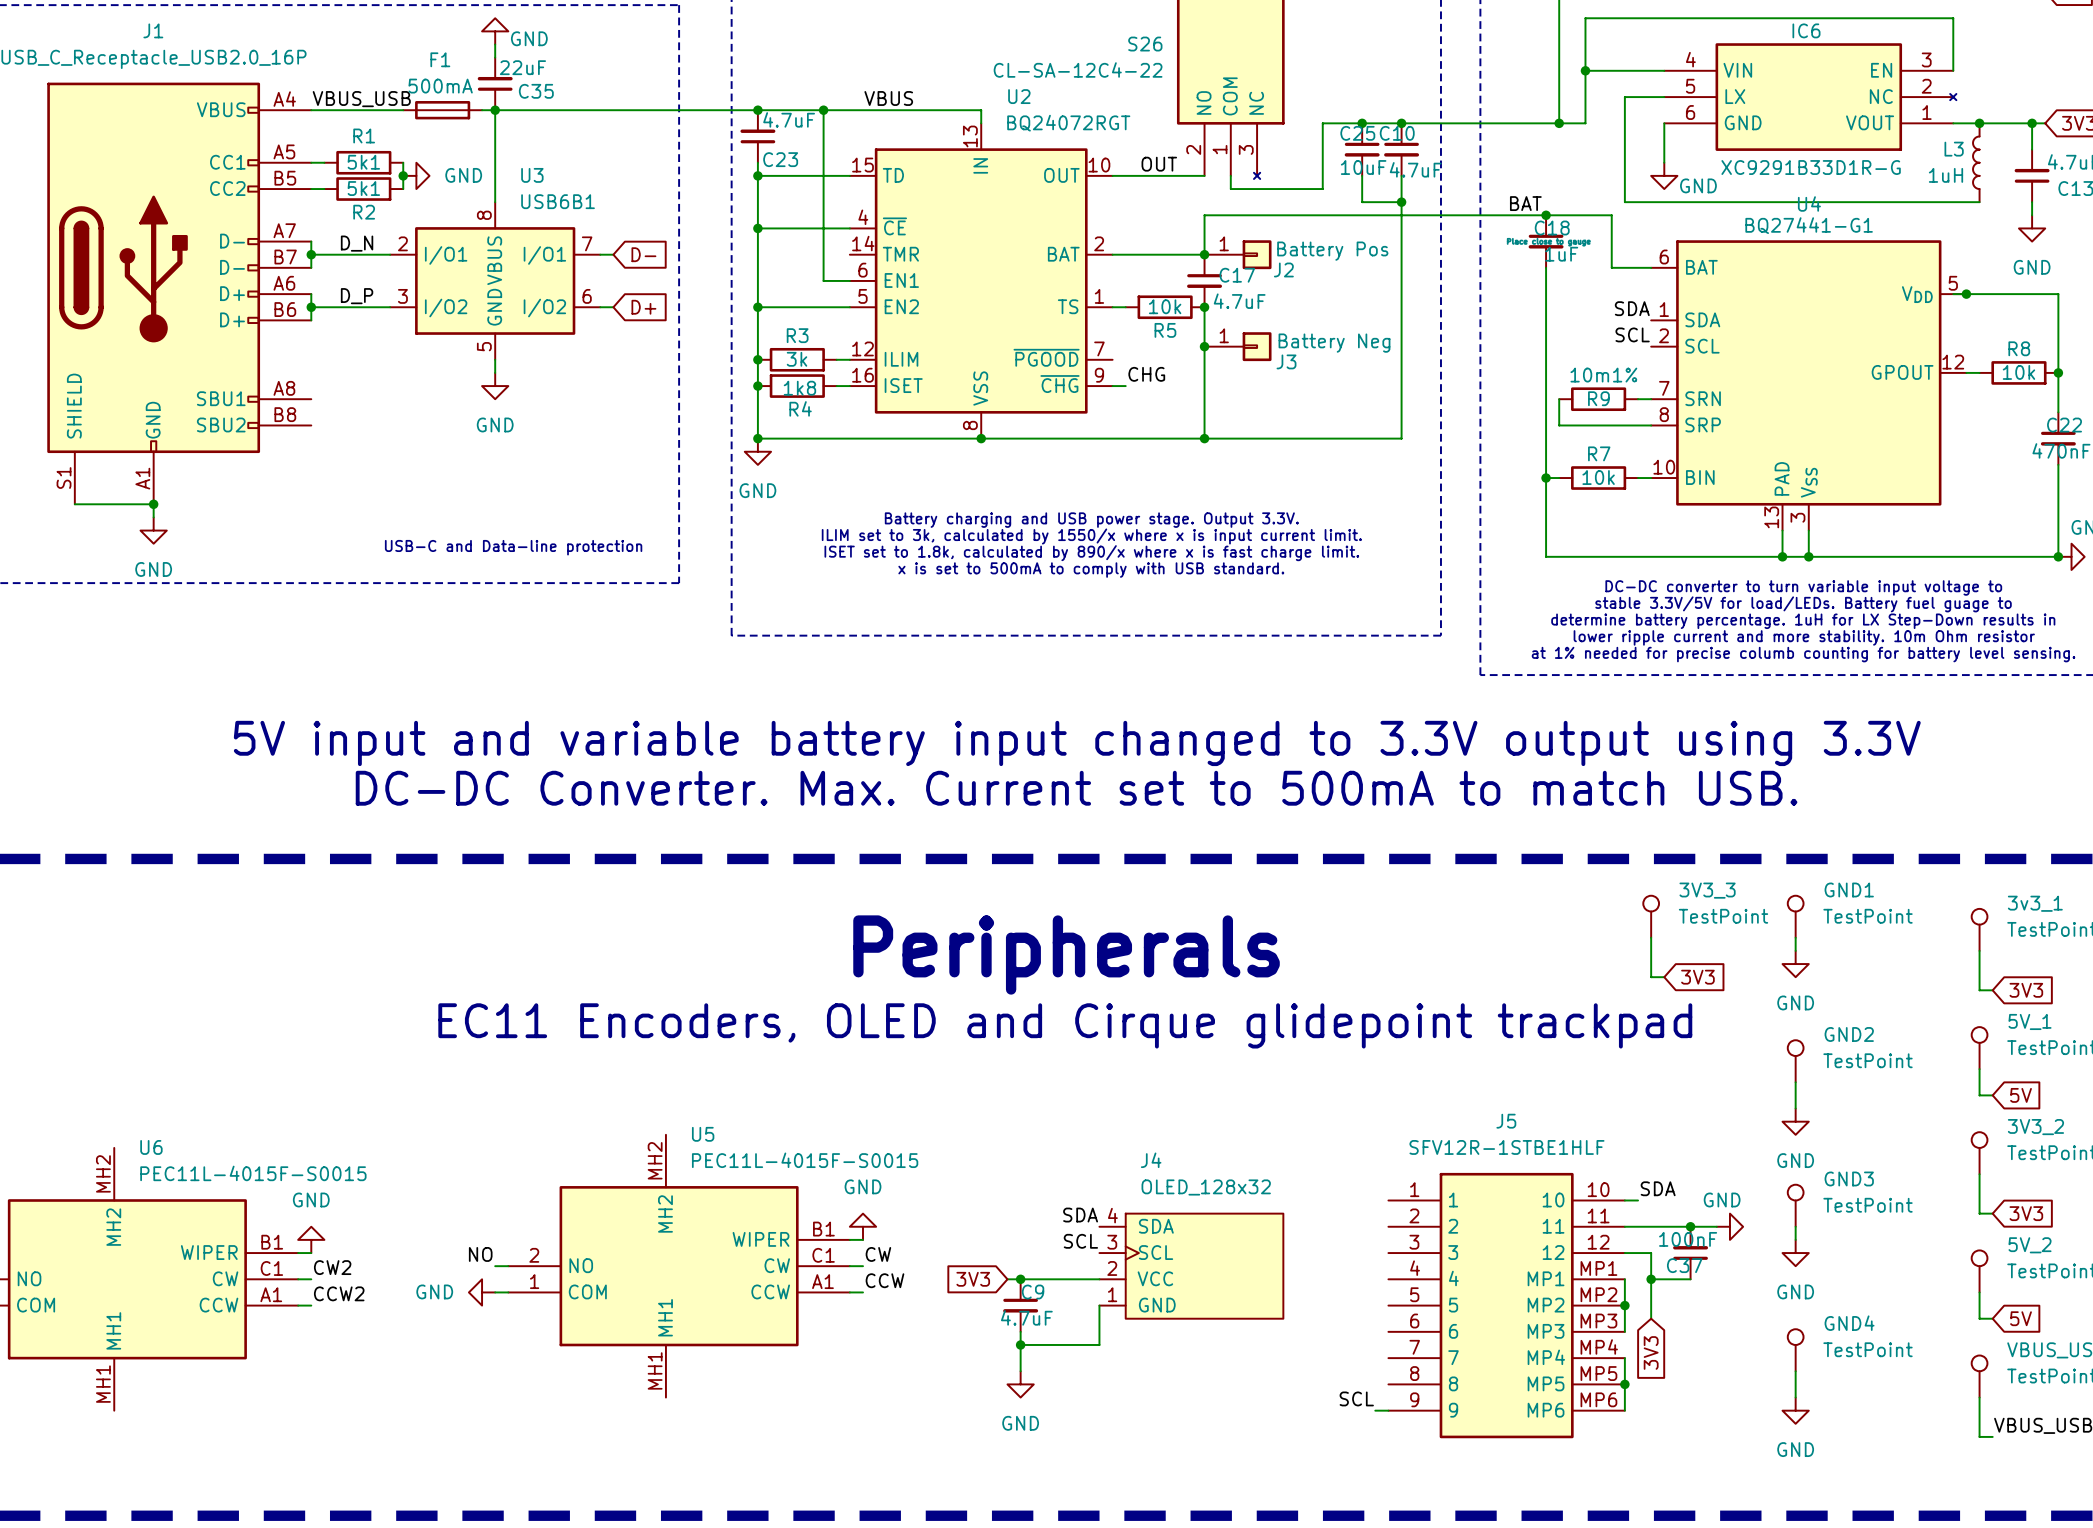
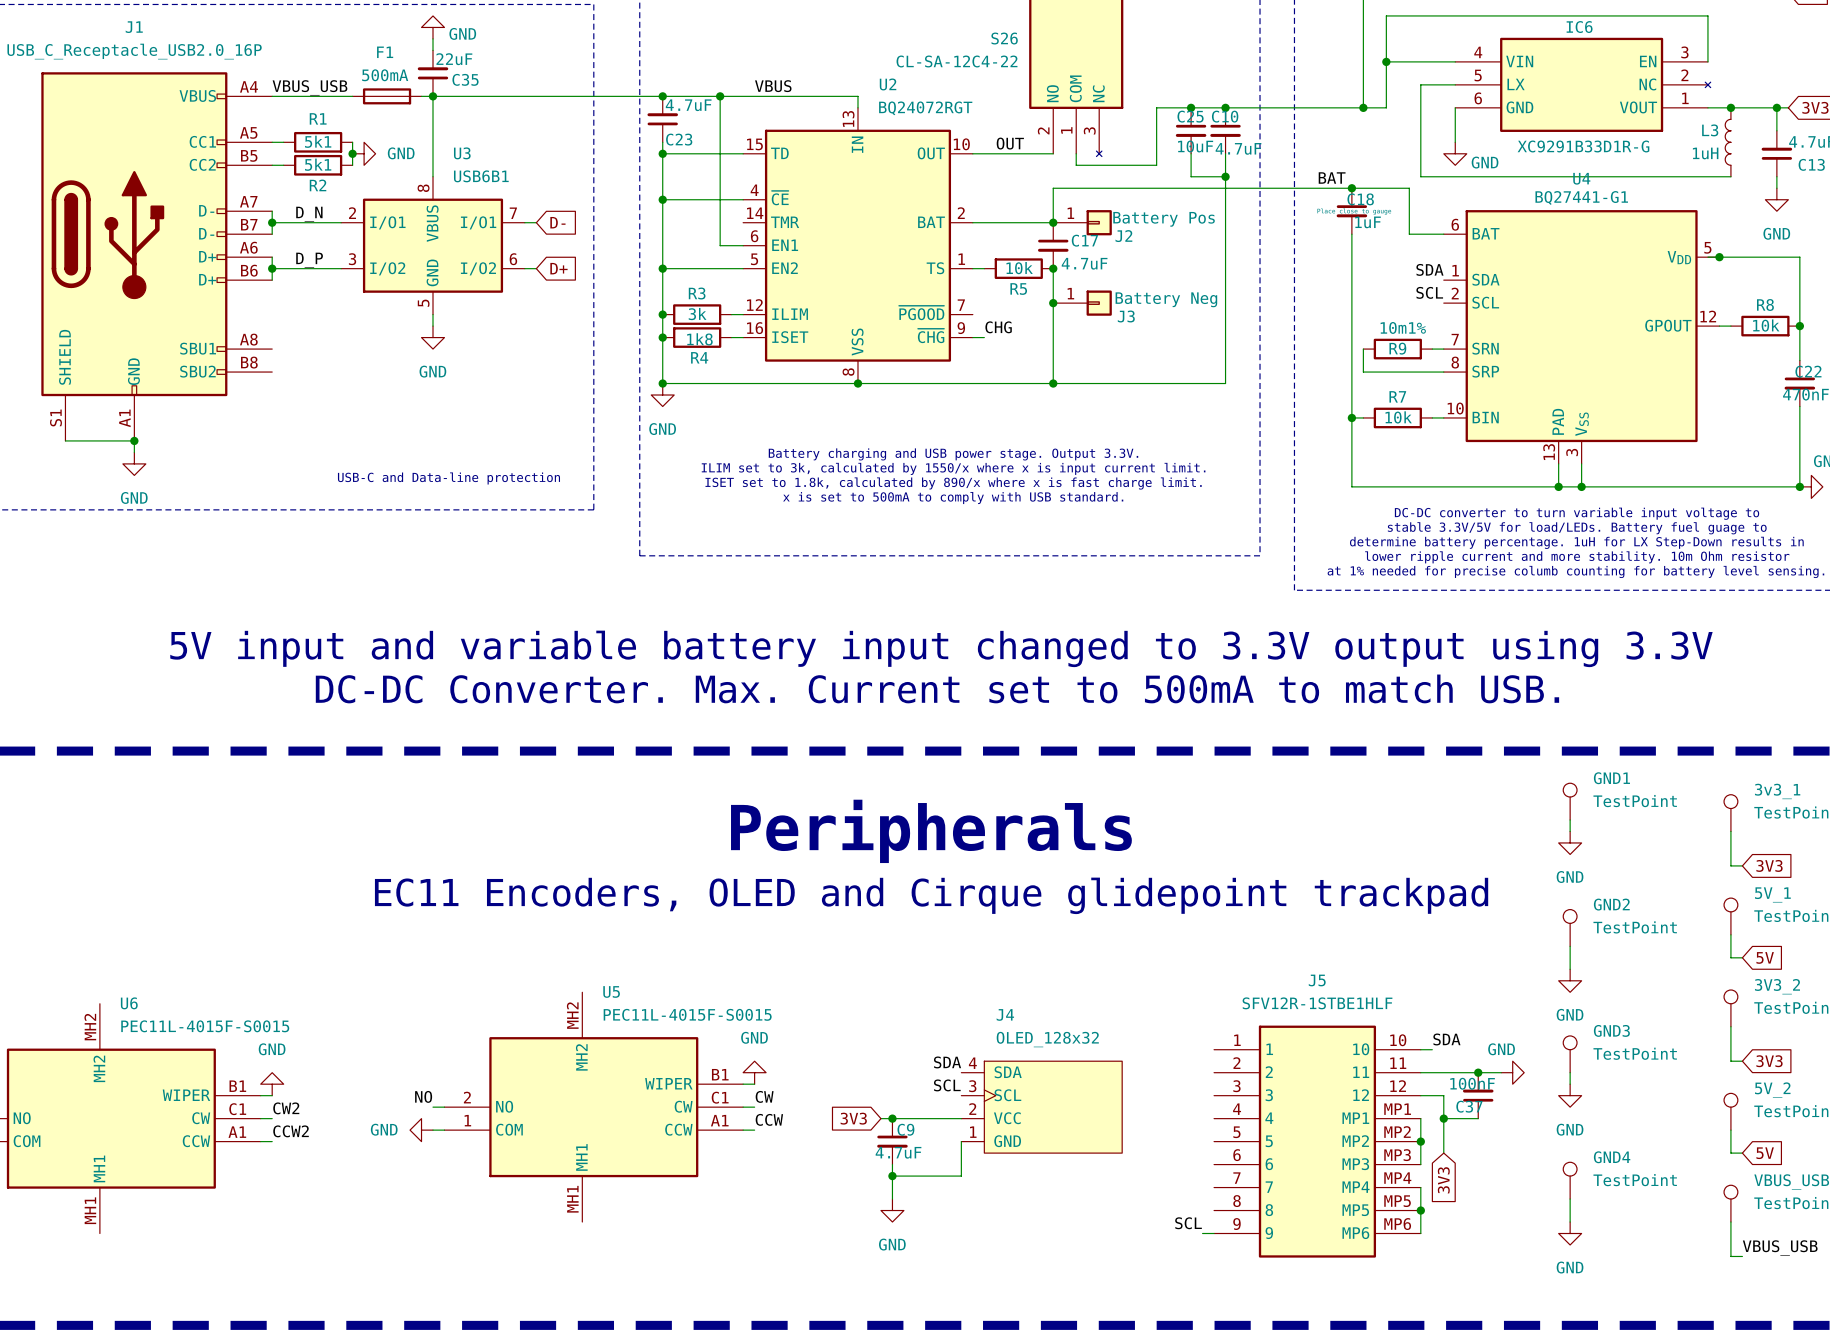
3V3_3: TestPoint (1651, 916) -> none
wire: (1651, 937) (1651, 977) (1664, 977) -> none
global label: 3V3 (1697, 977) -> none

